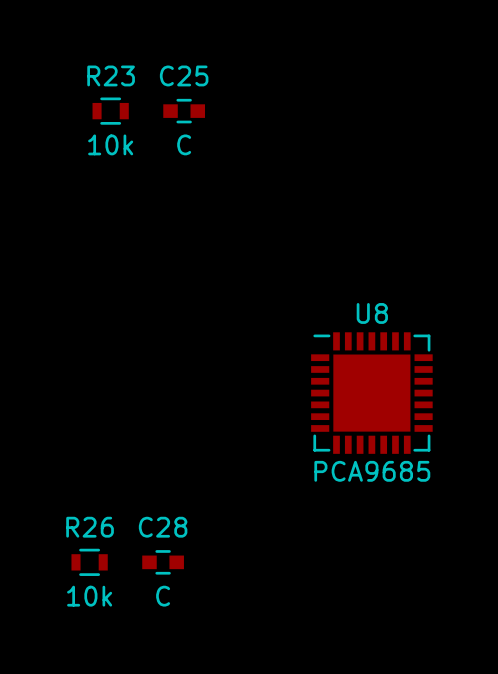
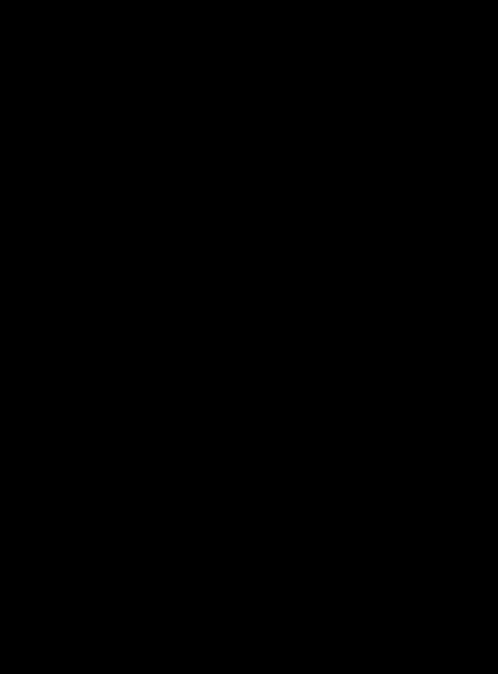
R23: 10k (110, 111) -> none
C25: C (184, 111) -> none
U8: PCA9685 (371, 393) -> none
R26: 10k (89, 562) -> none
C28: C (163, 562) -> none

